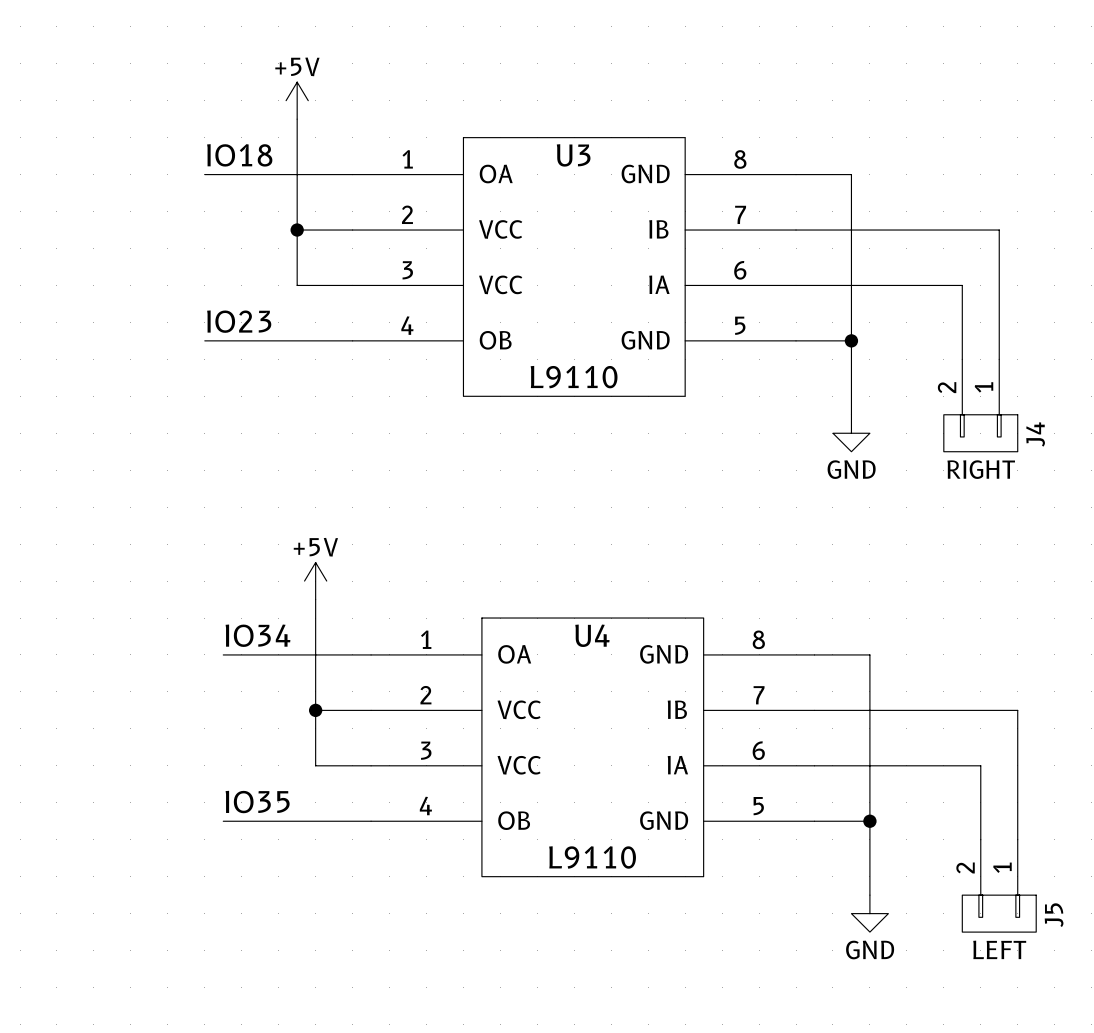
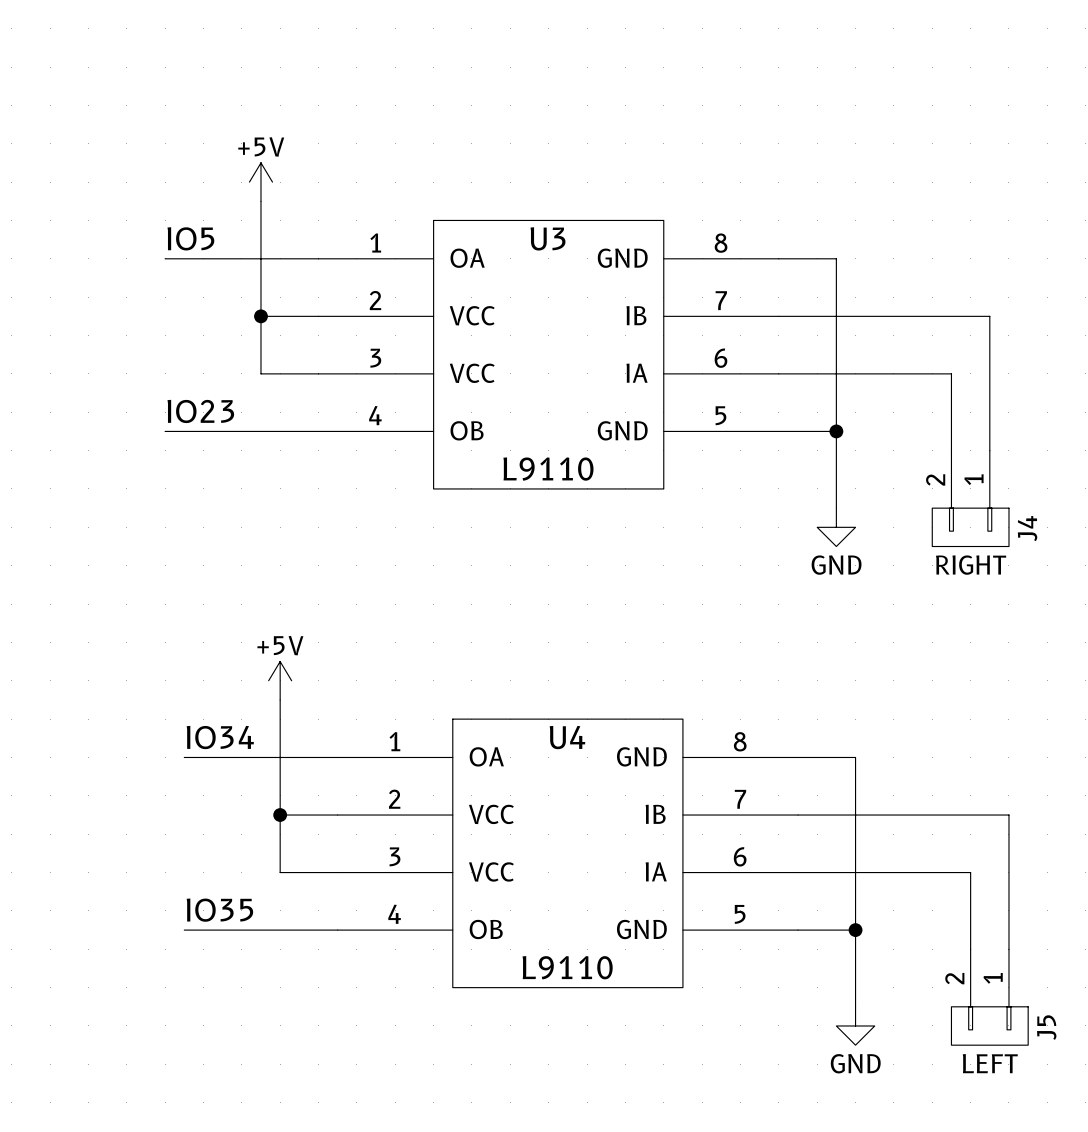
label: IO18 (239, 155) -> IO5 (190, 238)

